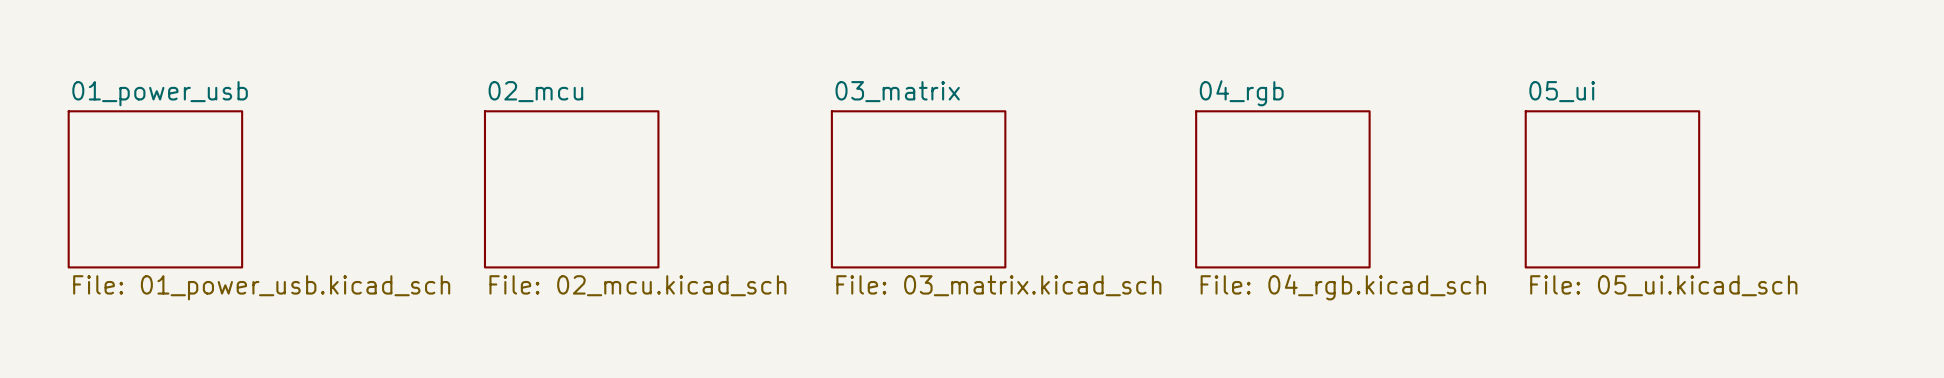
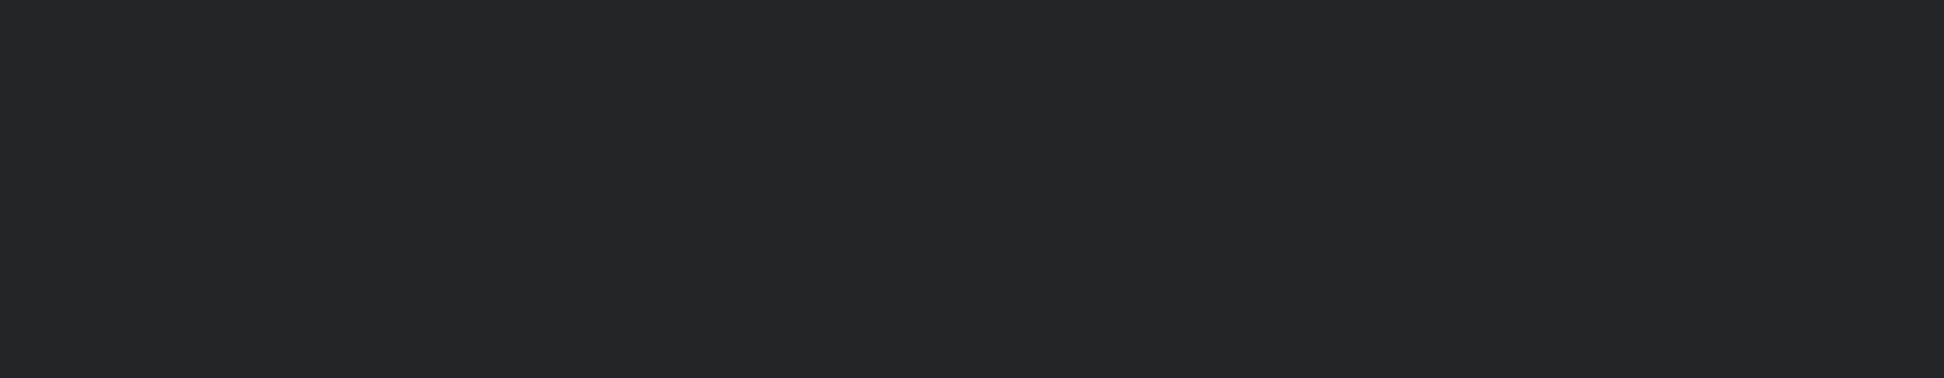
sheet 01_power_usb: File: 01_power_usb.kicad_sch (155, 189) -> none
sheet 02_mcu: File: 02_mcu.kicad_sch (571, 189) -> none
sheet 03_matrix: File: 03_matrix.kicad_sch (918, 189) -> none
sheet 04_rgb: File: 04_rgb.kicad_sch (1282, 189) -> none
sheet 05_ui: File: 05_ui.kicad_sch (1612, 189) -> none

